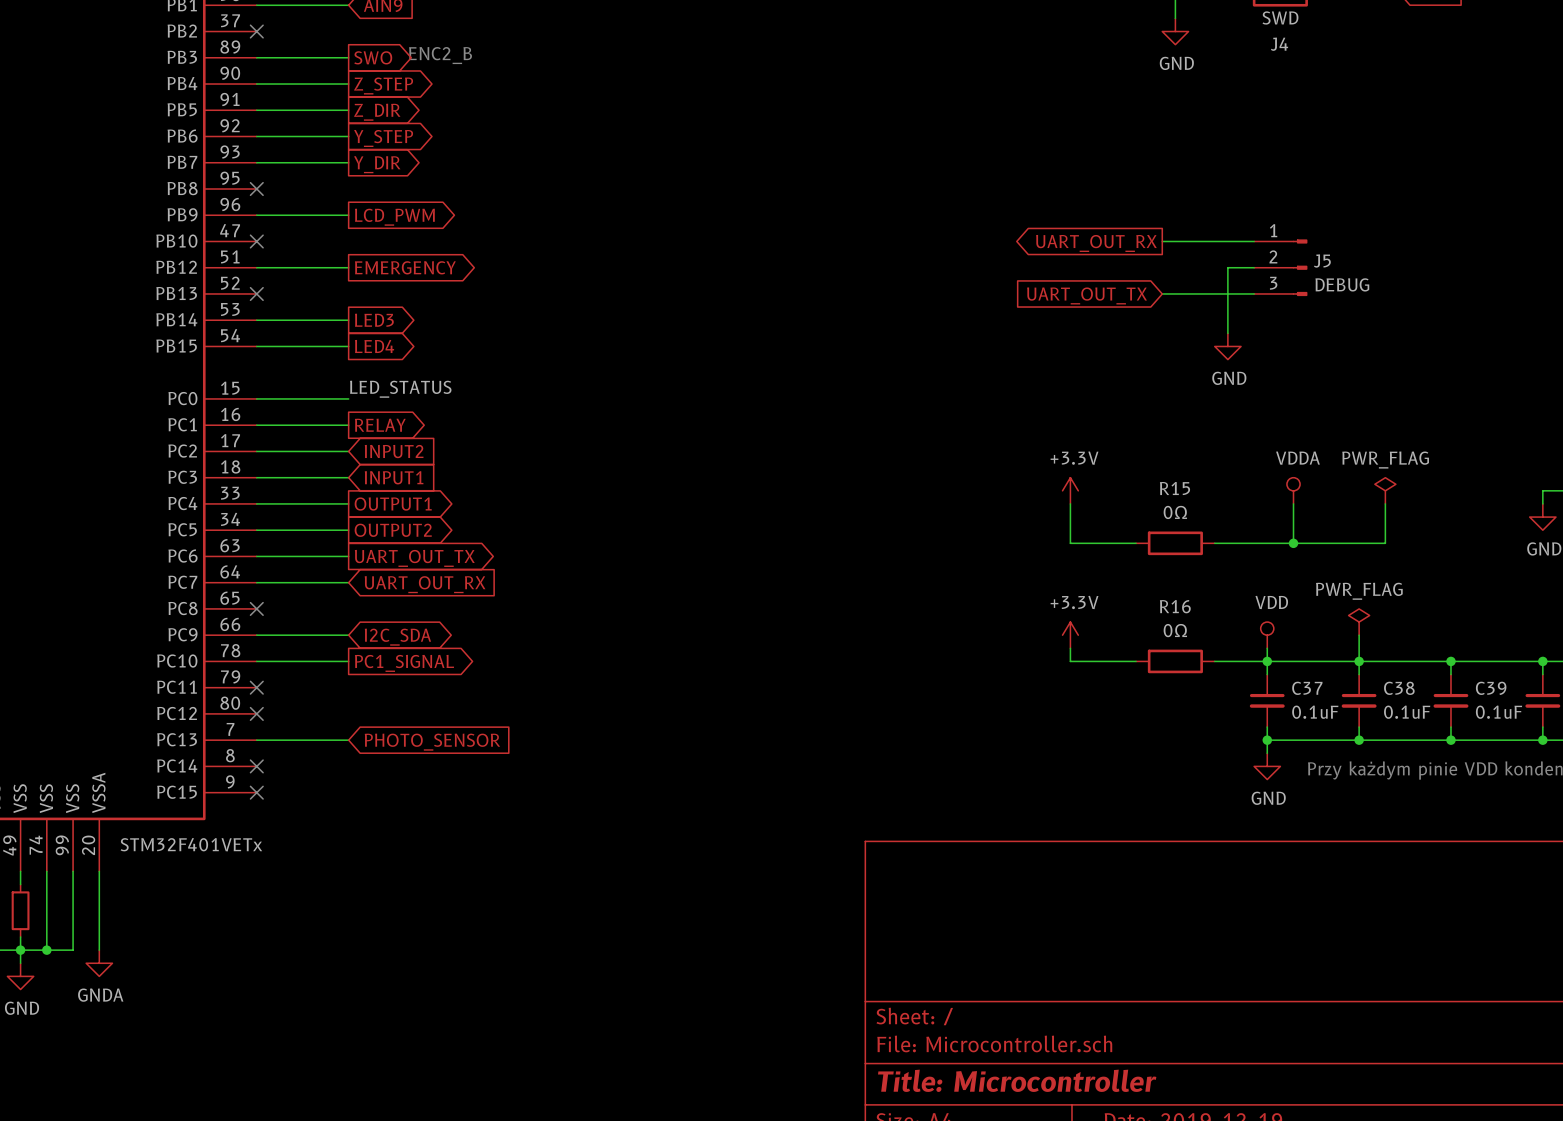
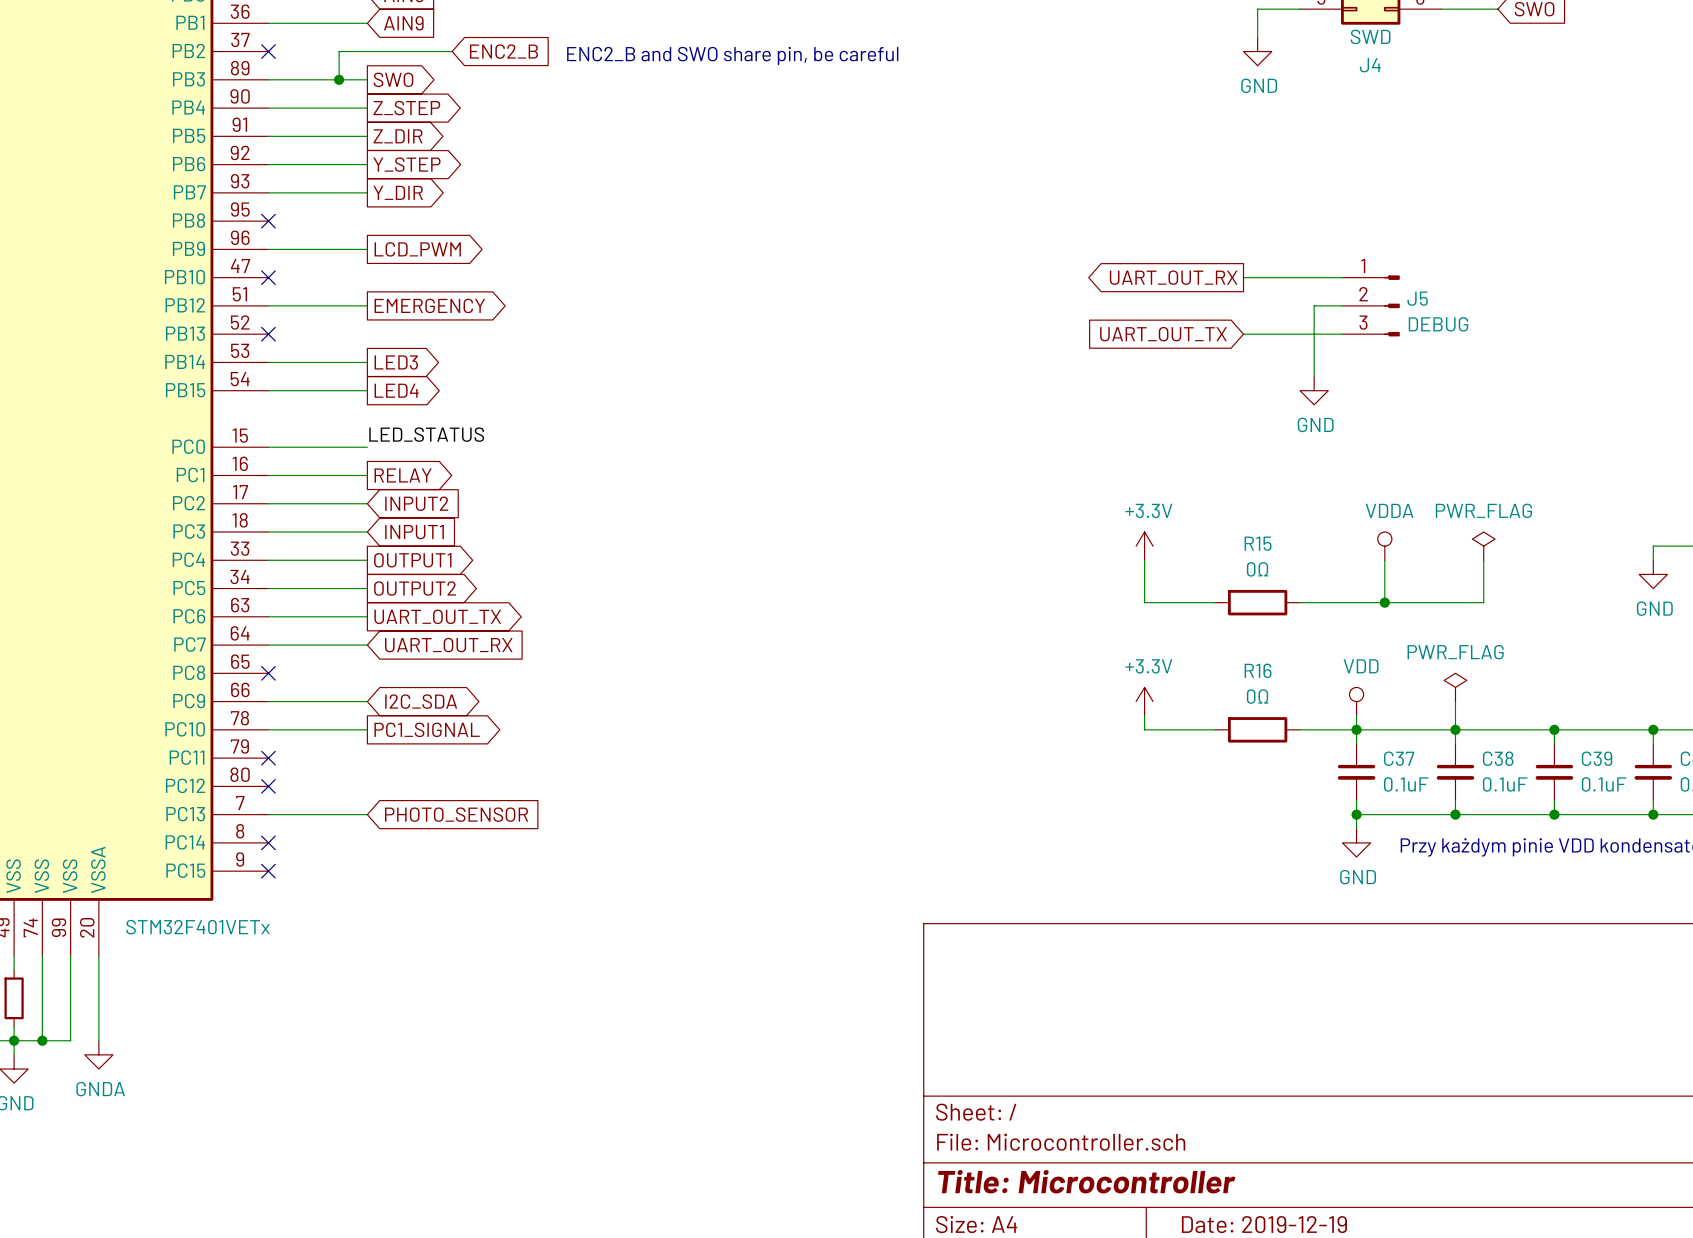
wire: none -> (452, 51) (339, 51) (339, 79)
global label: none -> ENC2_B (503, 51)
text: none -> ENC2_B and SWO share pin, be careful (732, 55)
text: ENC2_B (440, 55) -> none
junction: none -> (339, 79)

